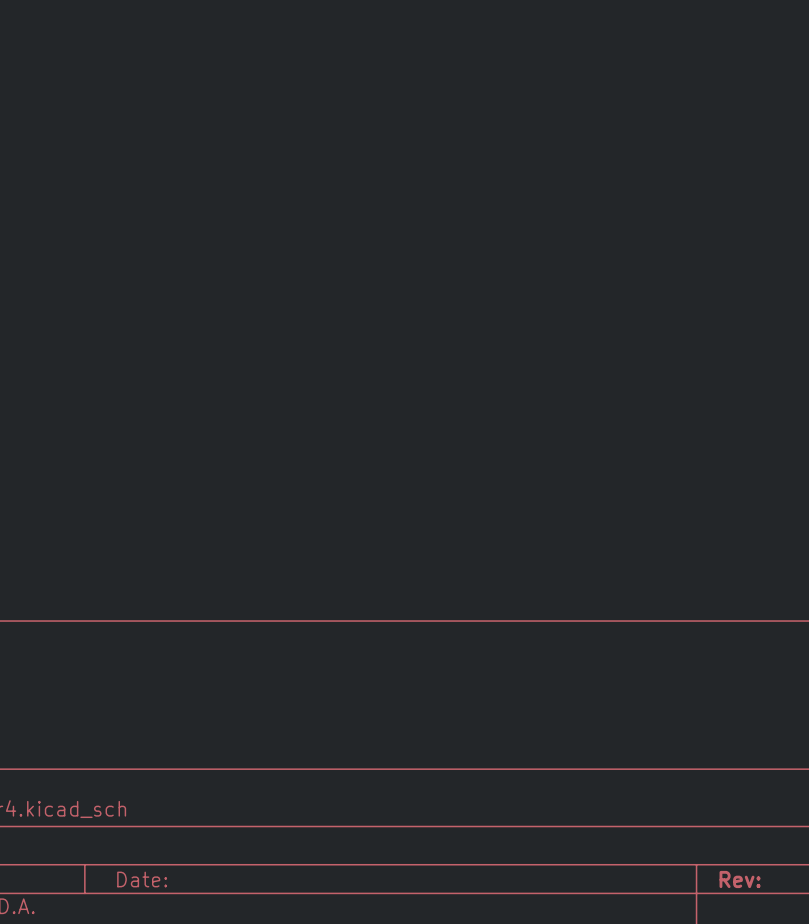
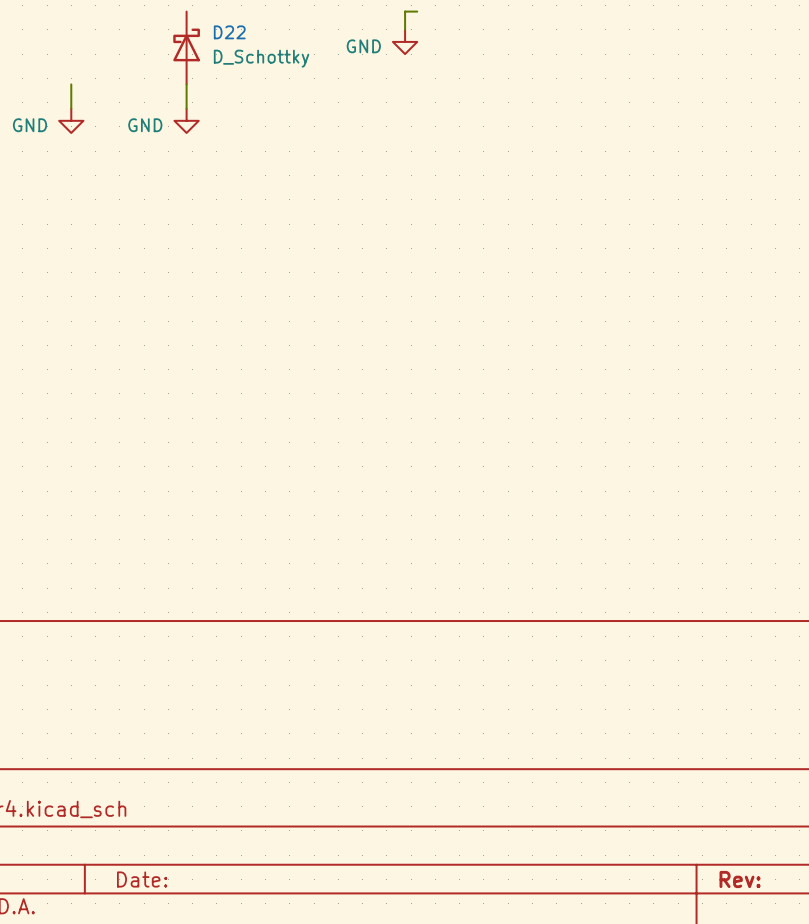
wire: none -> (417, 11) (405, 11) (405, 29)
power symbol: none -> GND (405, 41)
D22: none -> D_Schottky (186, 47)
wire: none -> (71, 84) (71, 108)
wire: none -> (186, 84) (186, 108)
power symbol: none -> GND (71, 120)
power symbol: none -> GND (186, 120)

